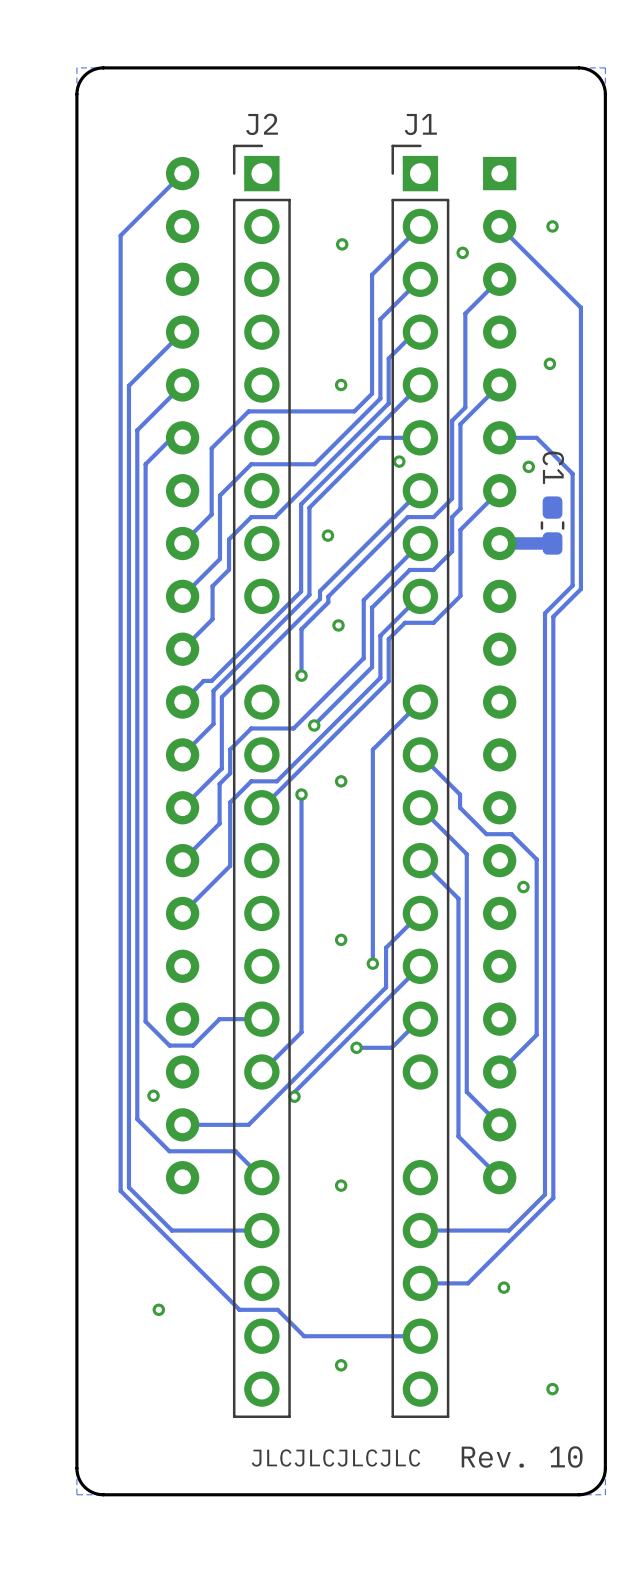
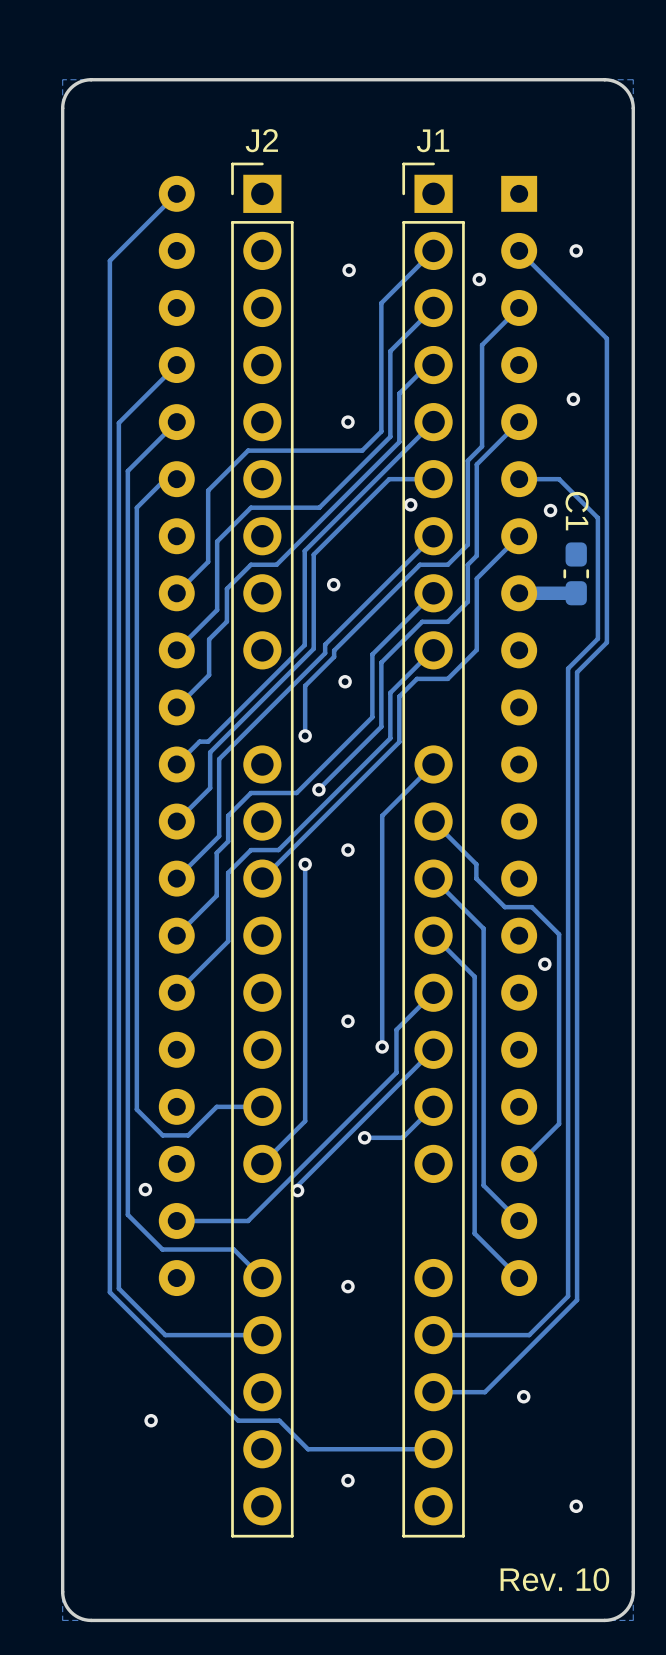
text: JLCJLCJLCJLC (336, 1457) -> none

